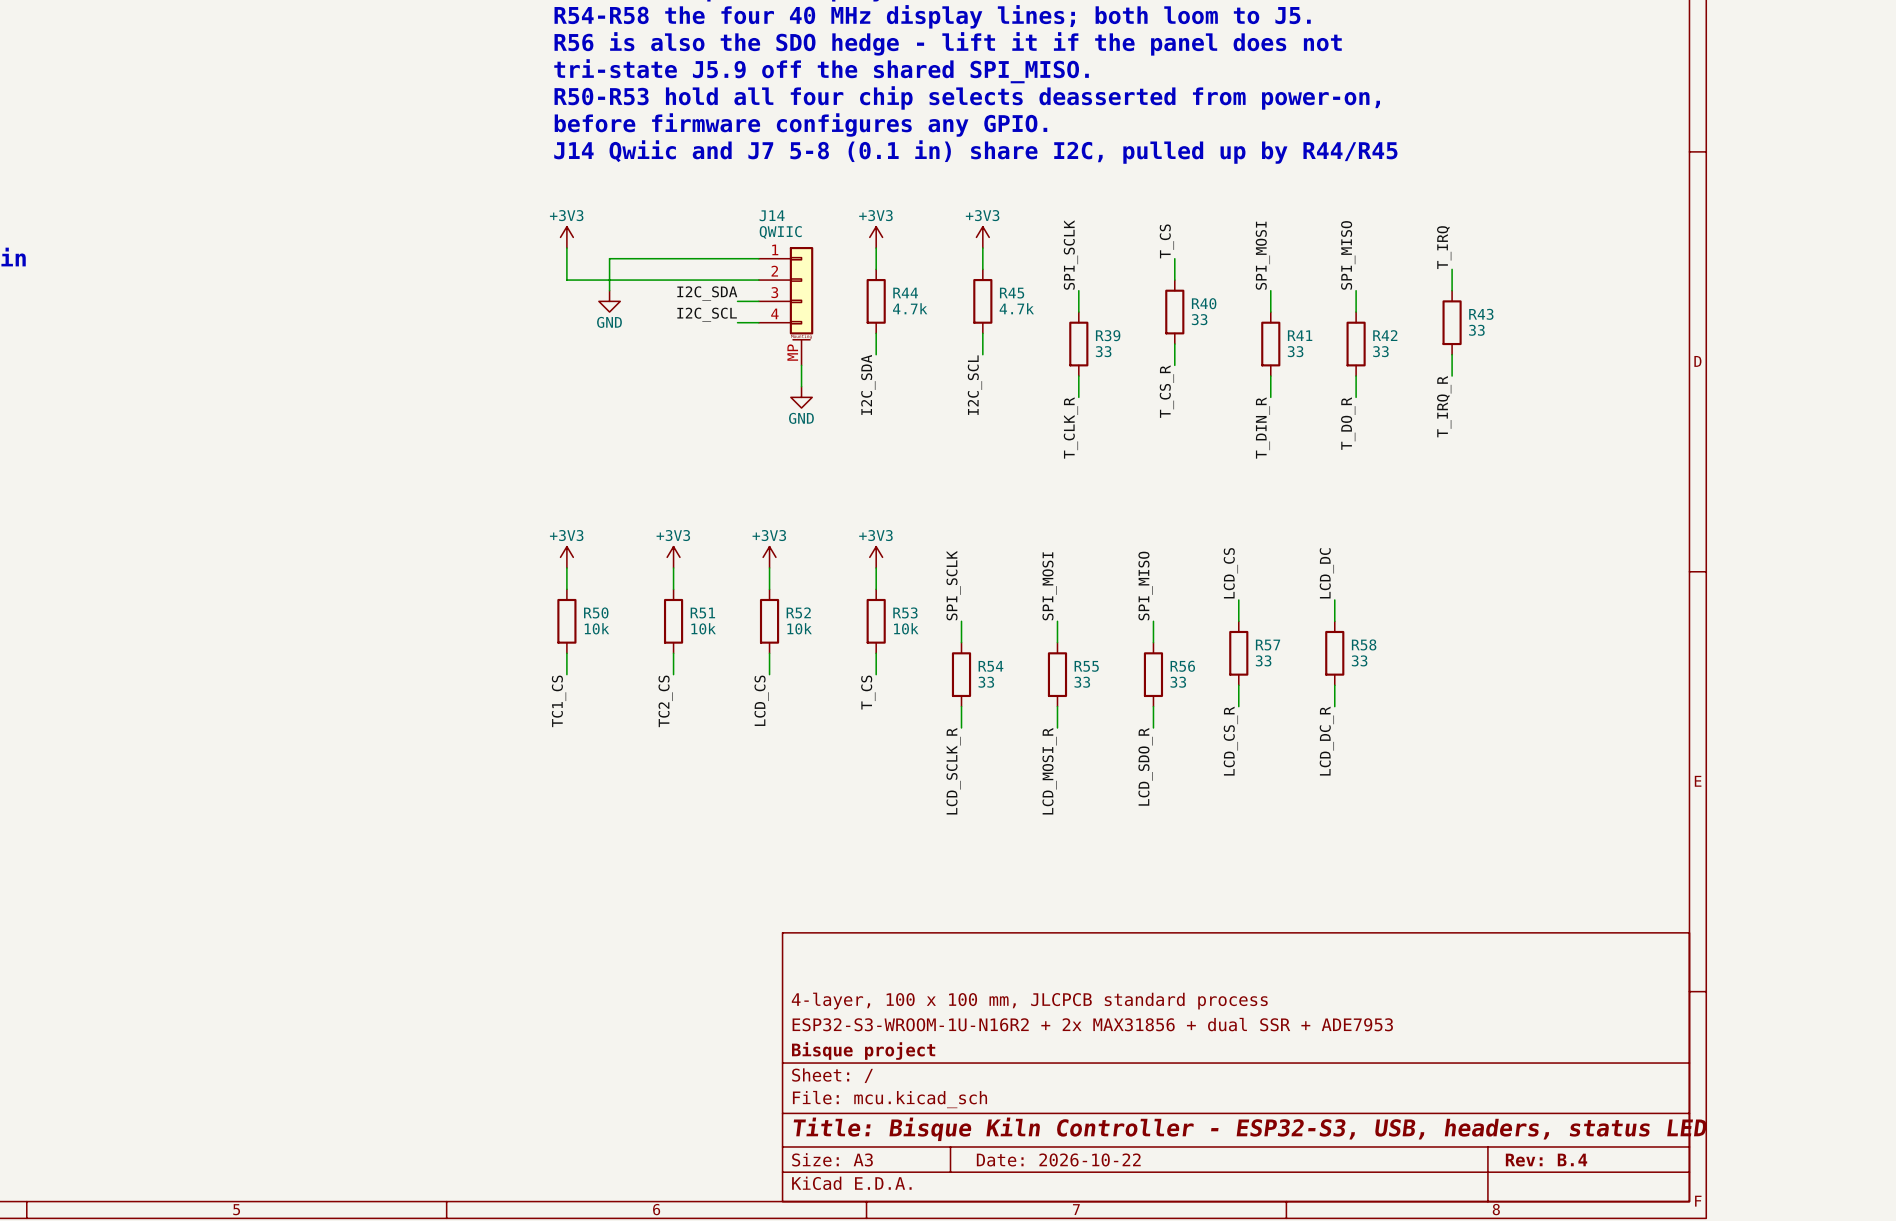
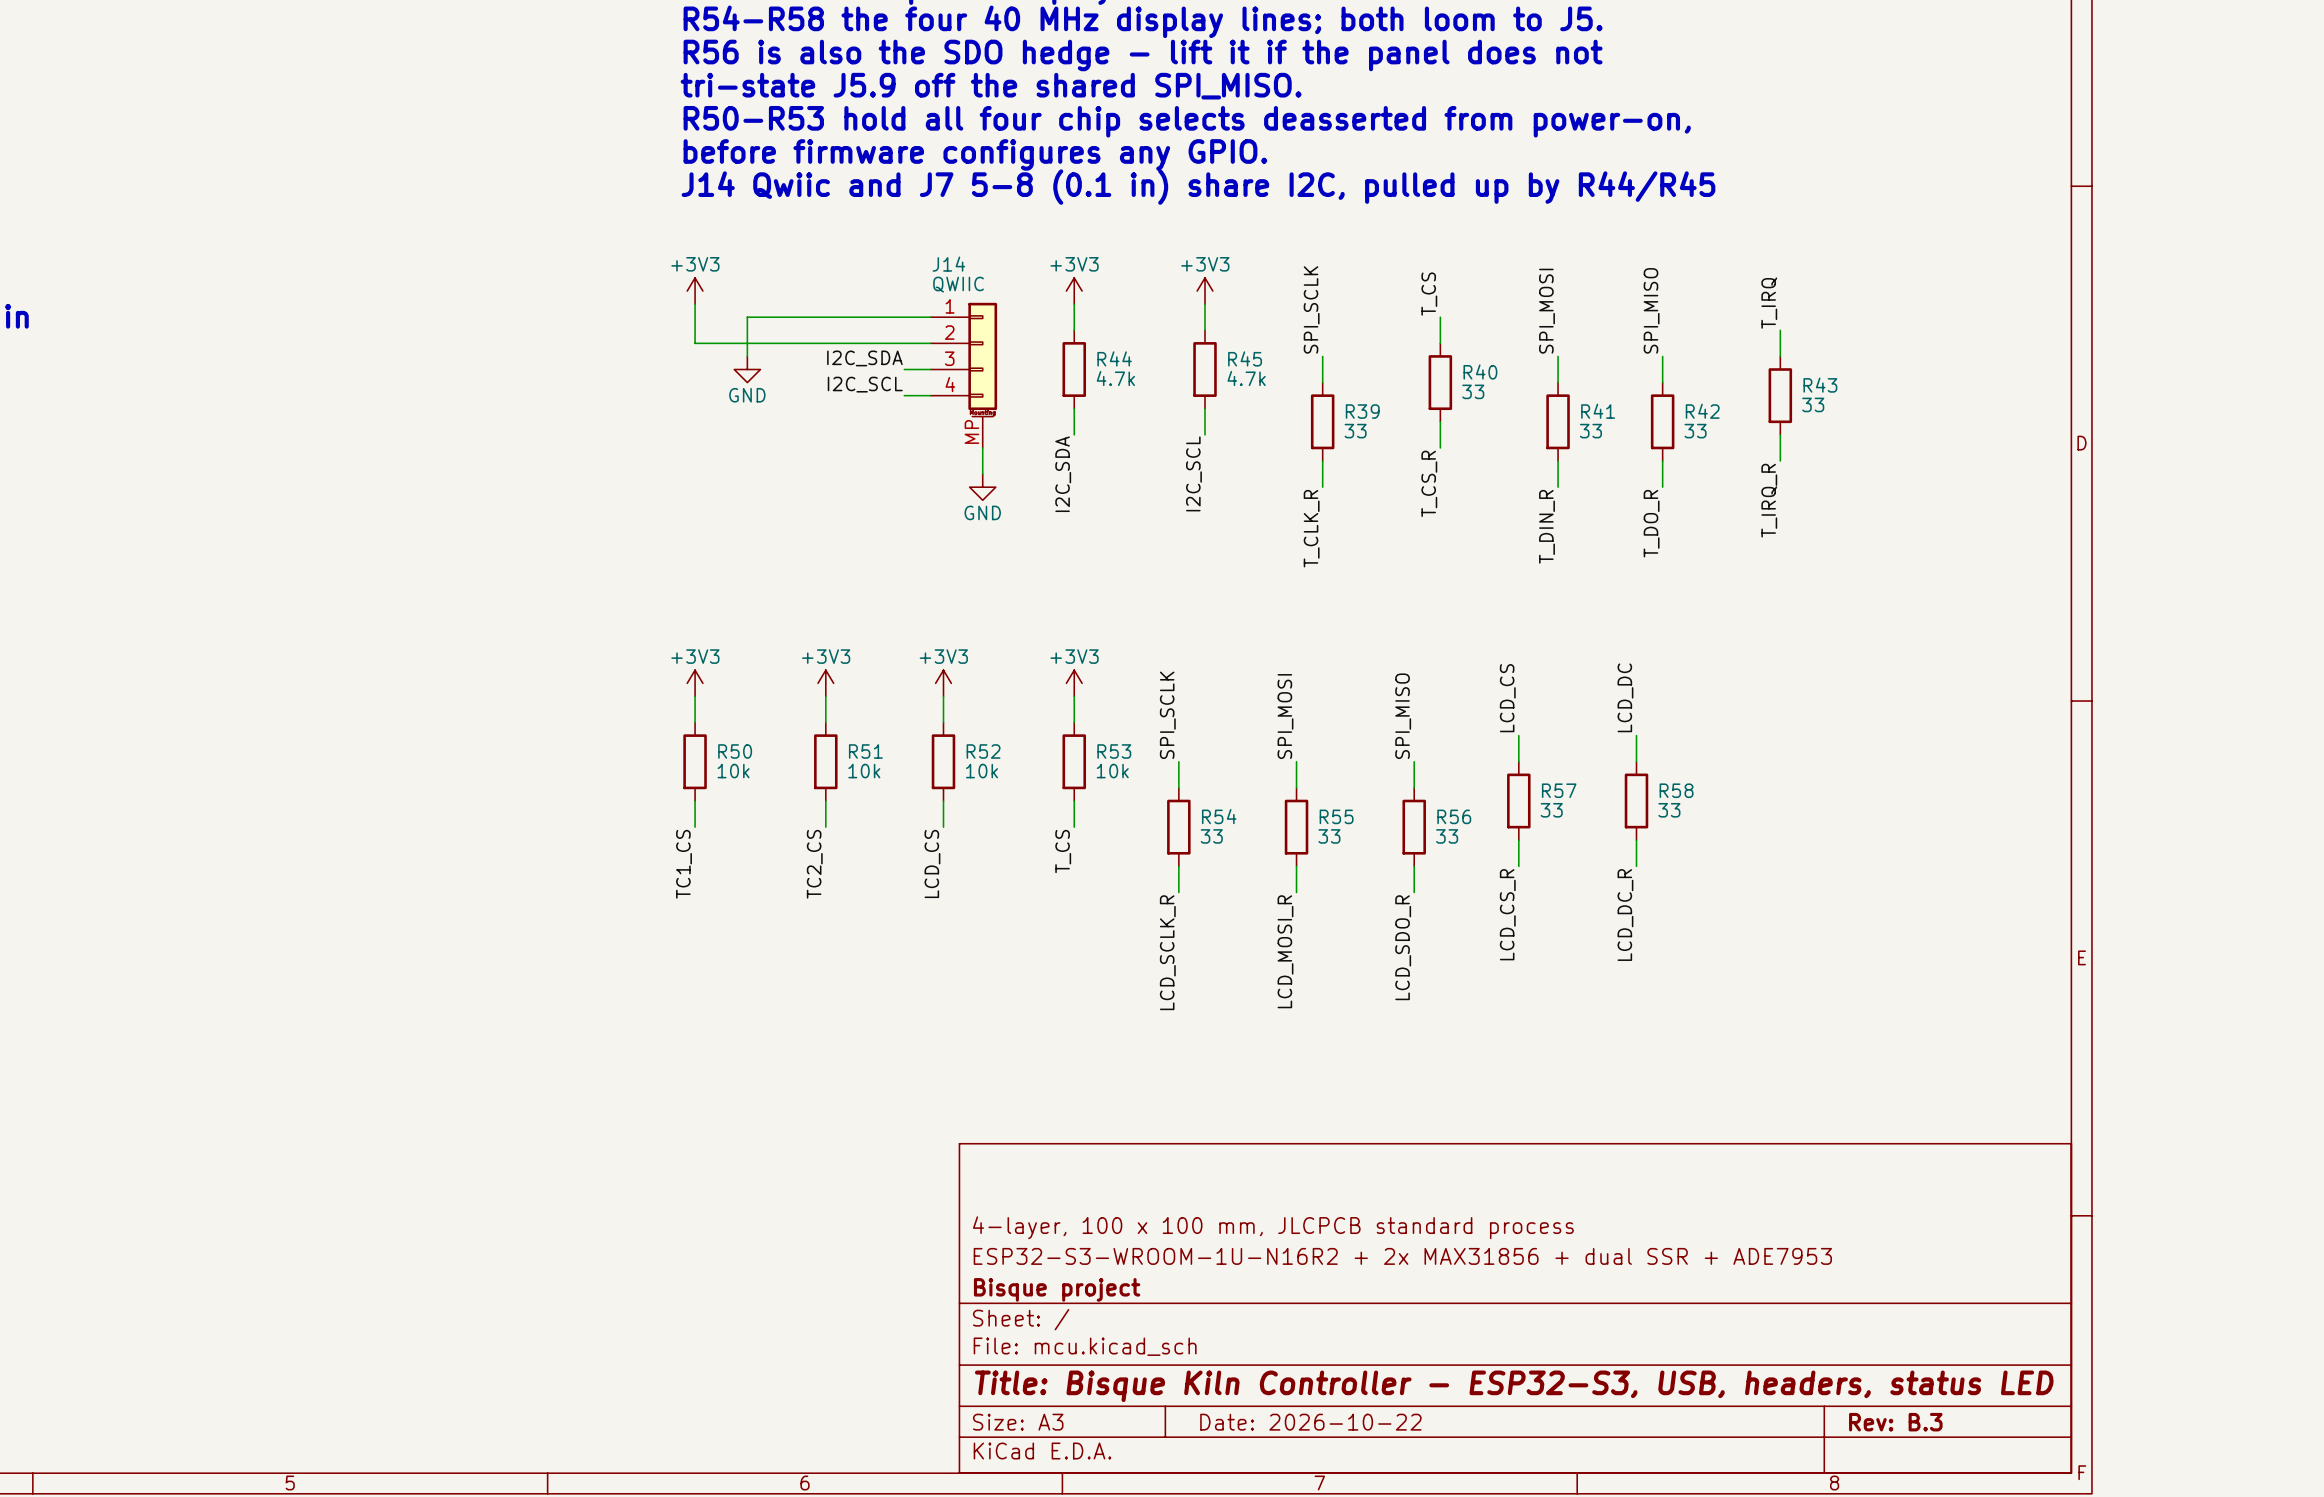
title block: Rev: B.4 (1546, 1160) -> Rev: B.3 (1895, 1422)

